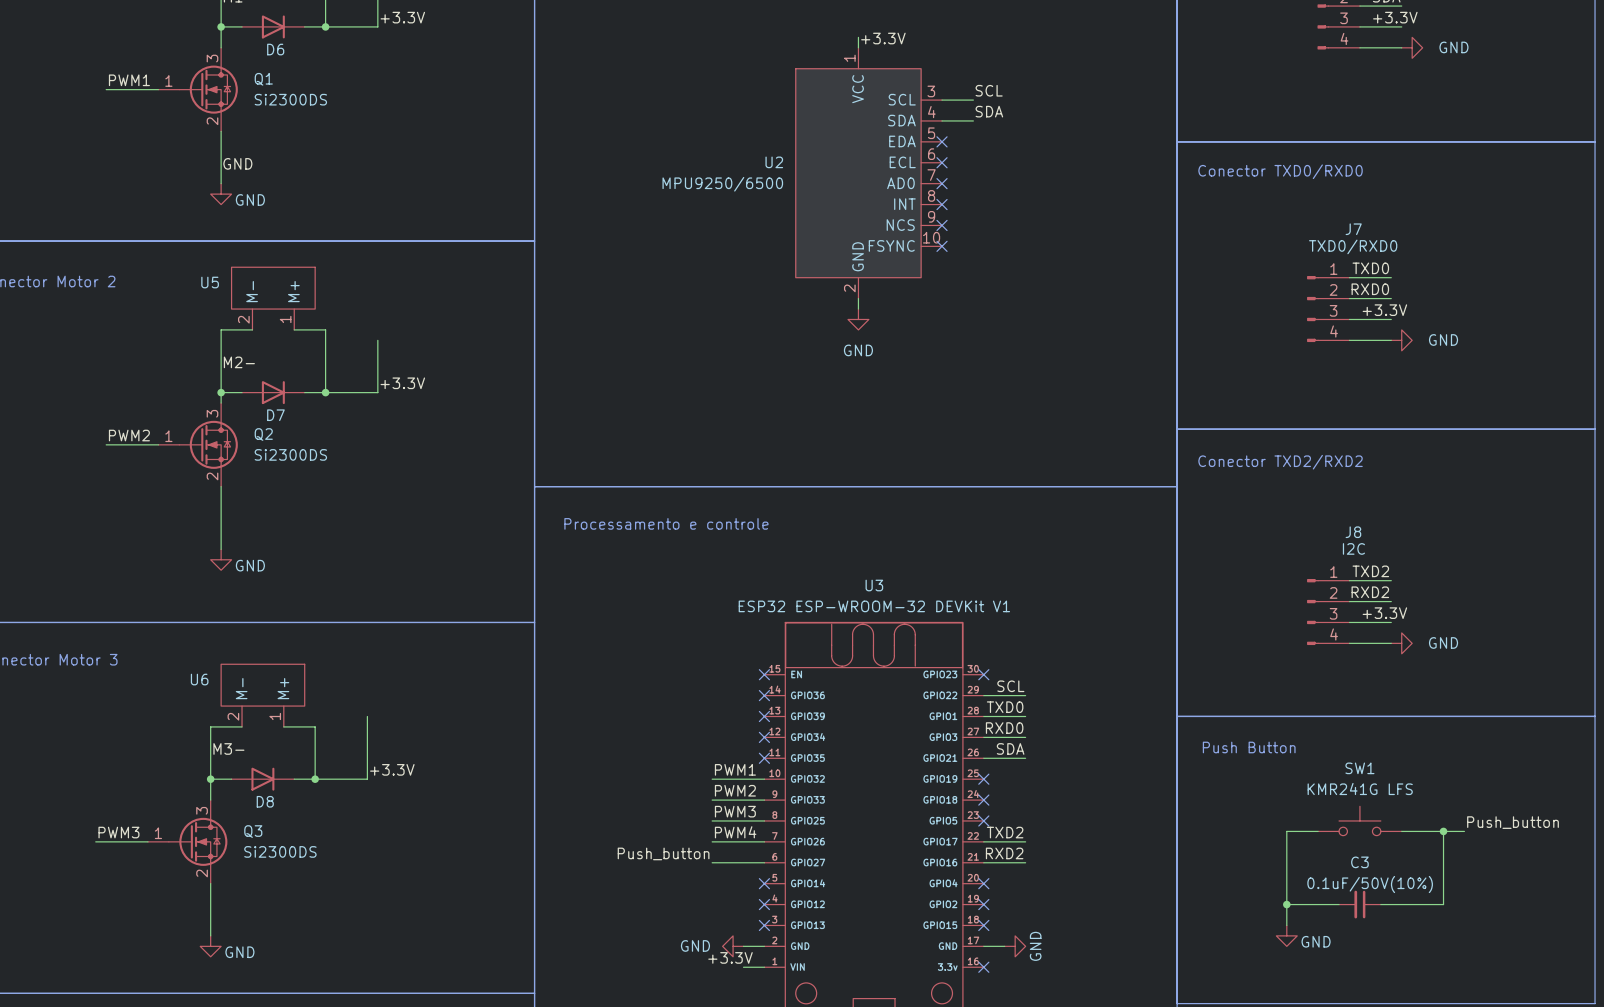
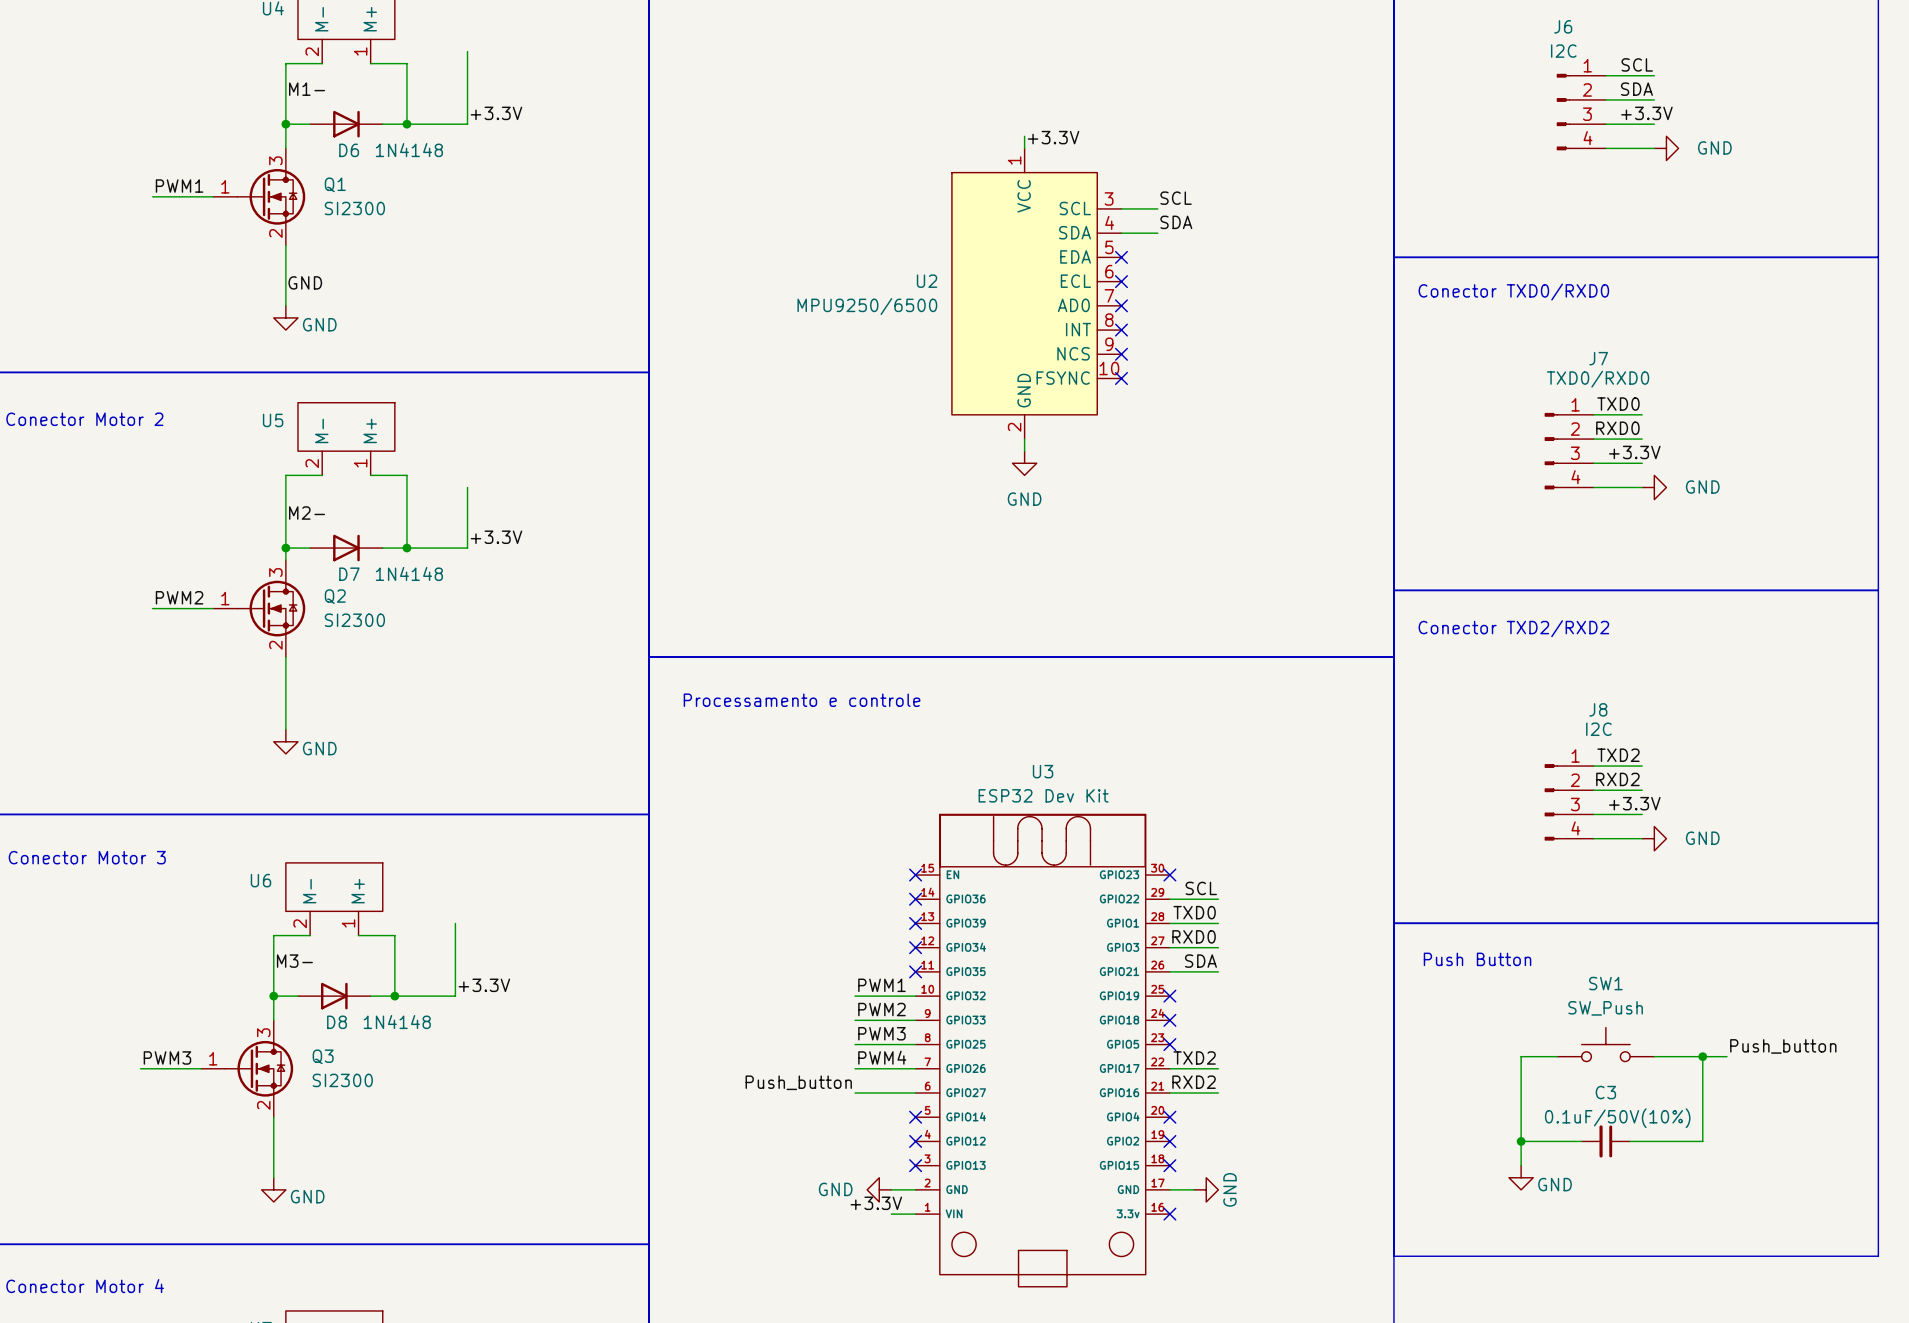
D6 value: none -> 1N4148 (409, 150)
Q1 value: Si2300DS (290, 99) -> SI2300 (354, 208)
D7 value: none -> 1N4148 (409, 573)
Q2 value: Si2300DS (290, 454) -> SI2300 (354, 620)
U3 value: ESP32 ESP-WROOM-32 DEVKit V1 (874, 606) -> ESP32 Dev Kit (1043, 795)
SW1 value: KMR241G LFS (1360, 788) -> SW_Push (1605, 1008)
D8 value: none -> 1N4148 (397, 1022)
Q3 value: Si2300DS (280, 851) -> SI2300 (342, 1080)

